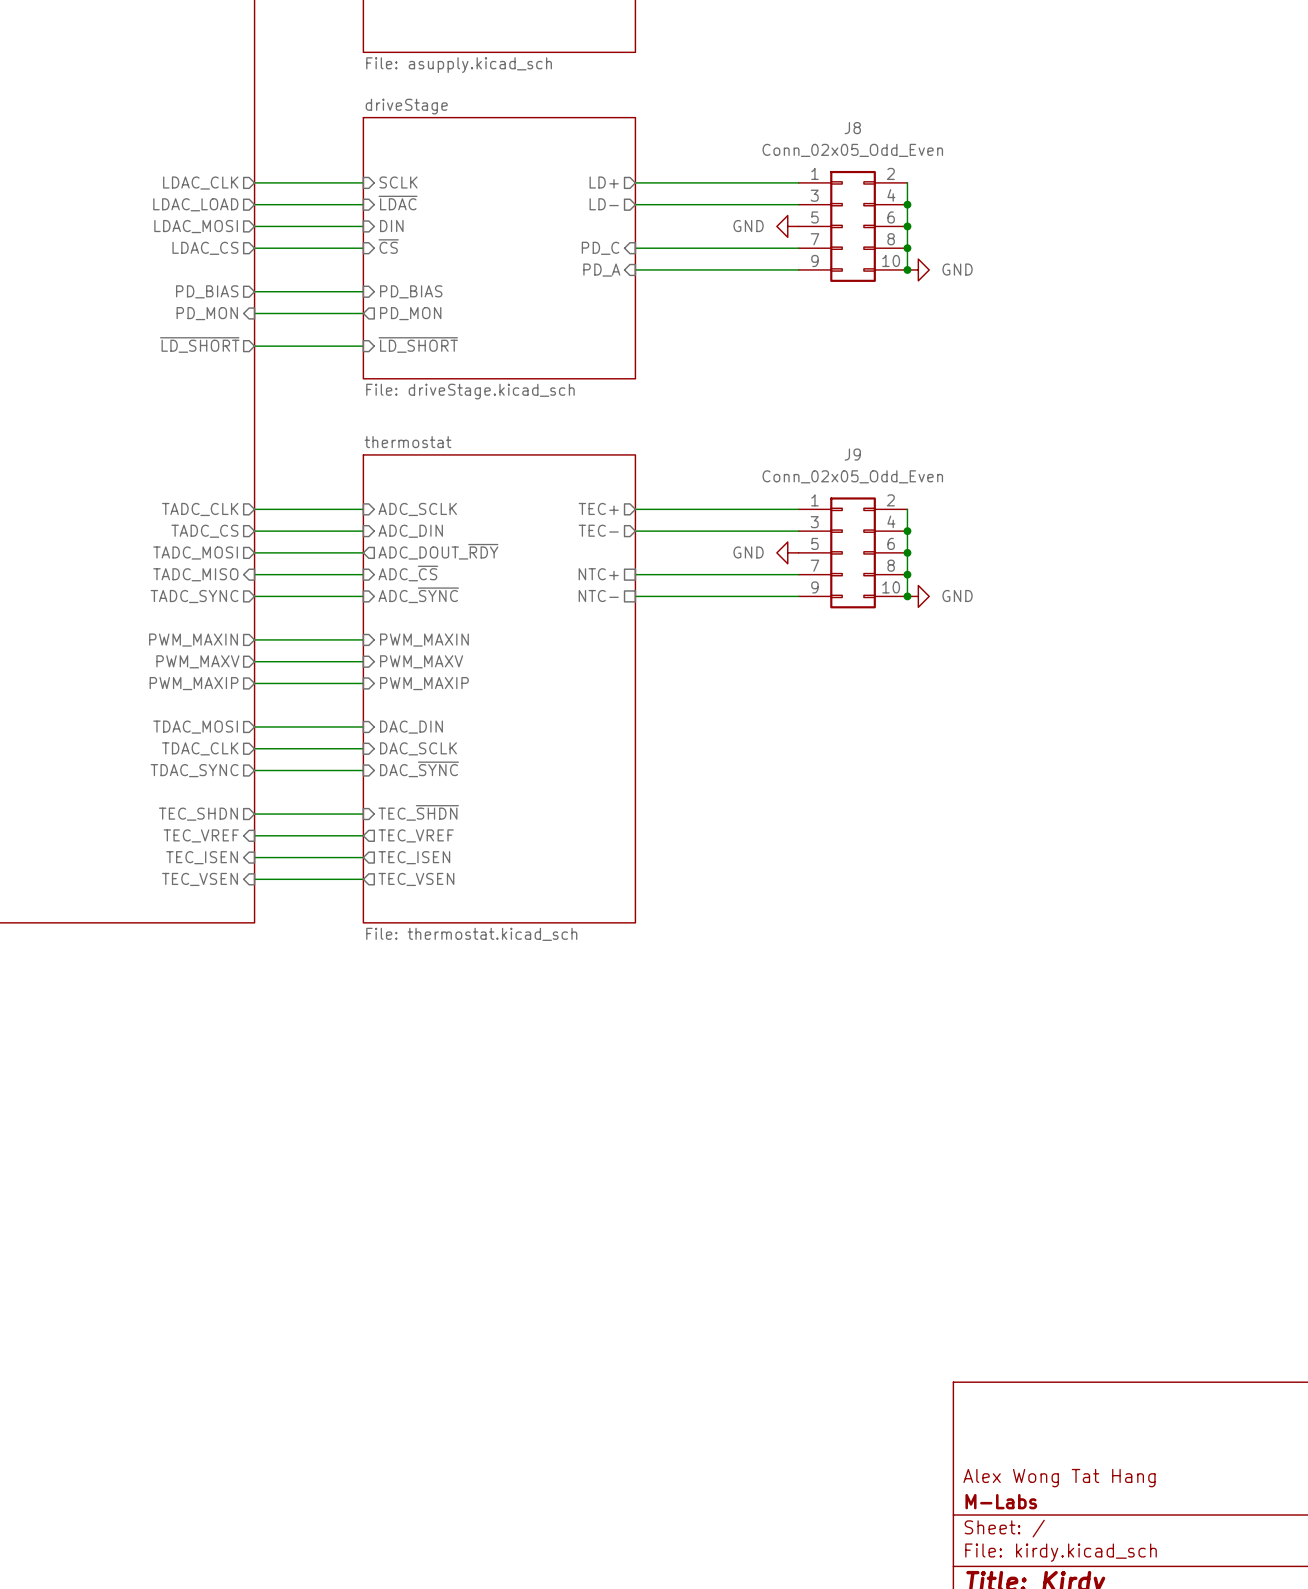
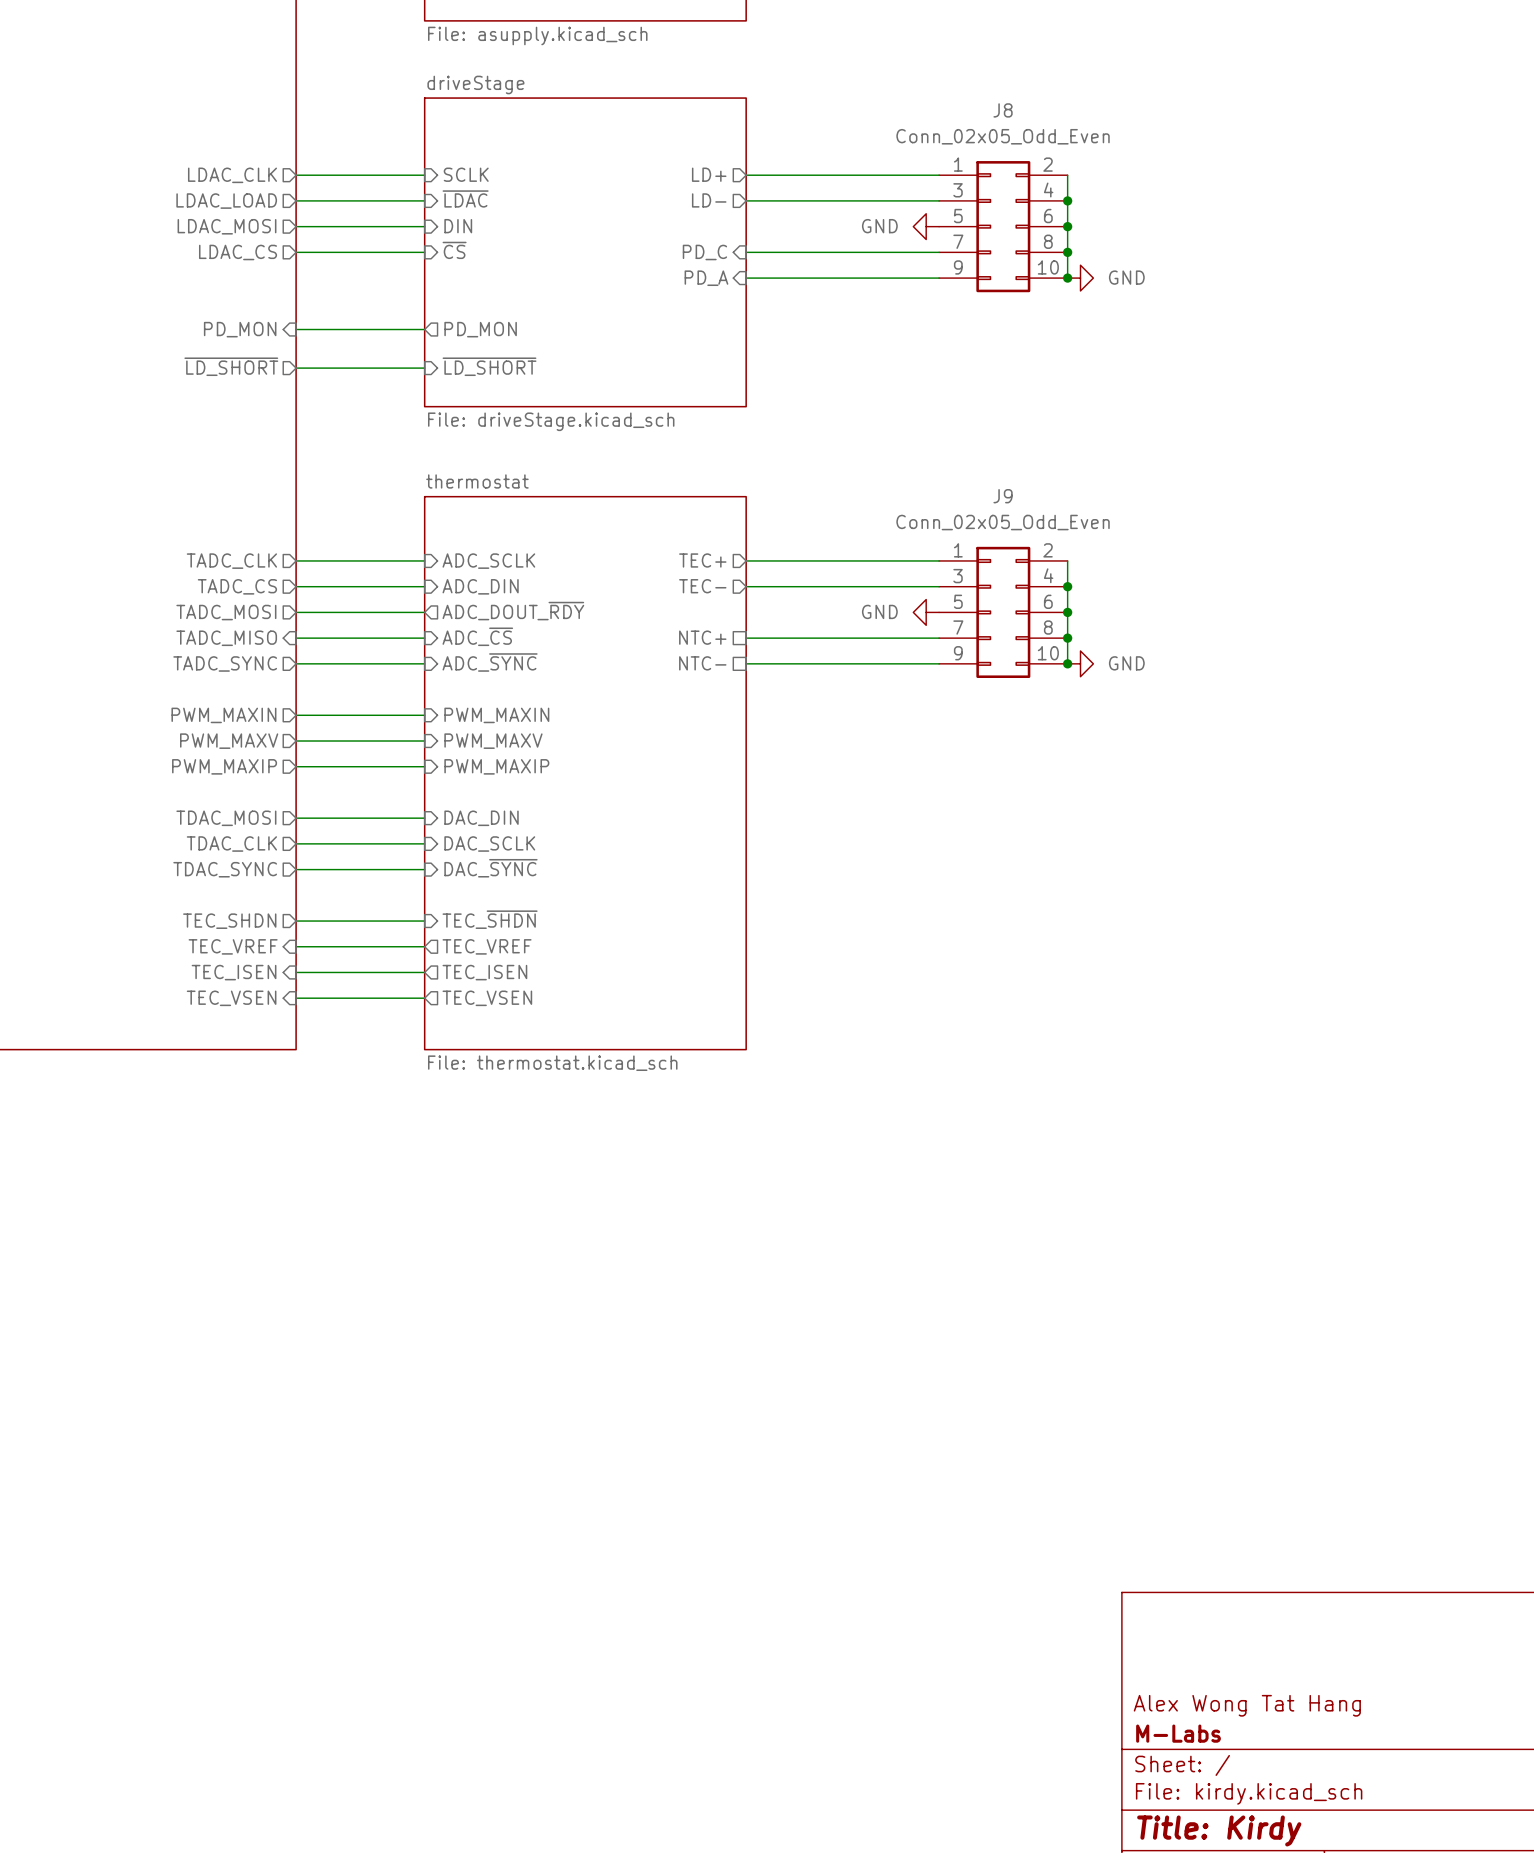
sheet pin: PD_BIAS (207, 291) -> none
wire: (254, 291) (363, 291) -> none
sheet pin: PD_BIAS (411, 291) -> none

